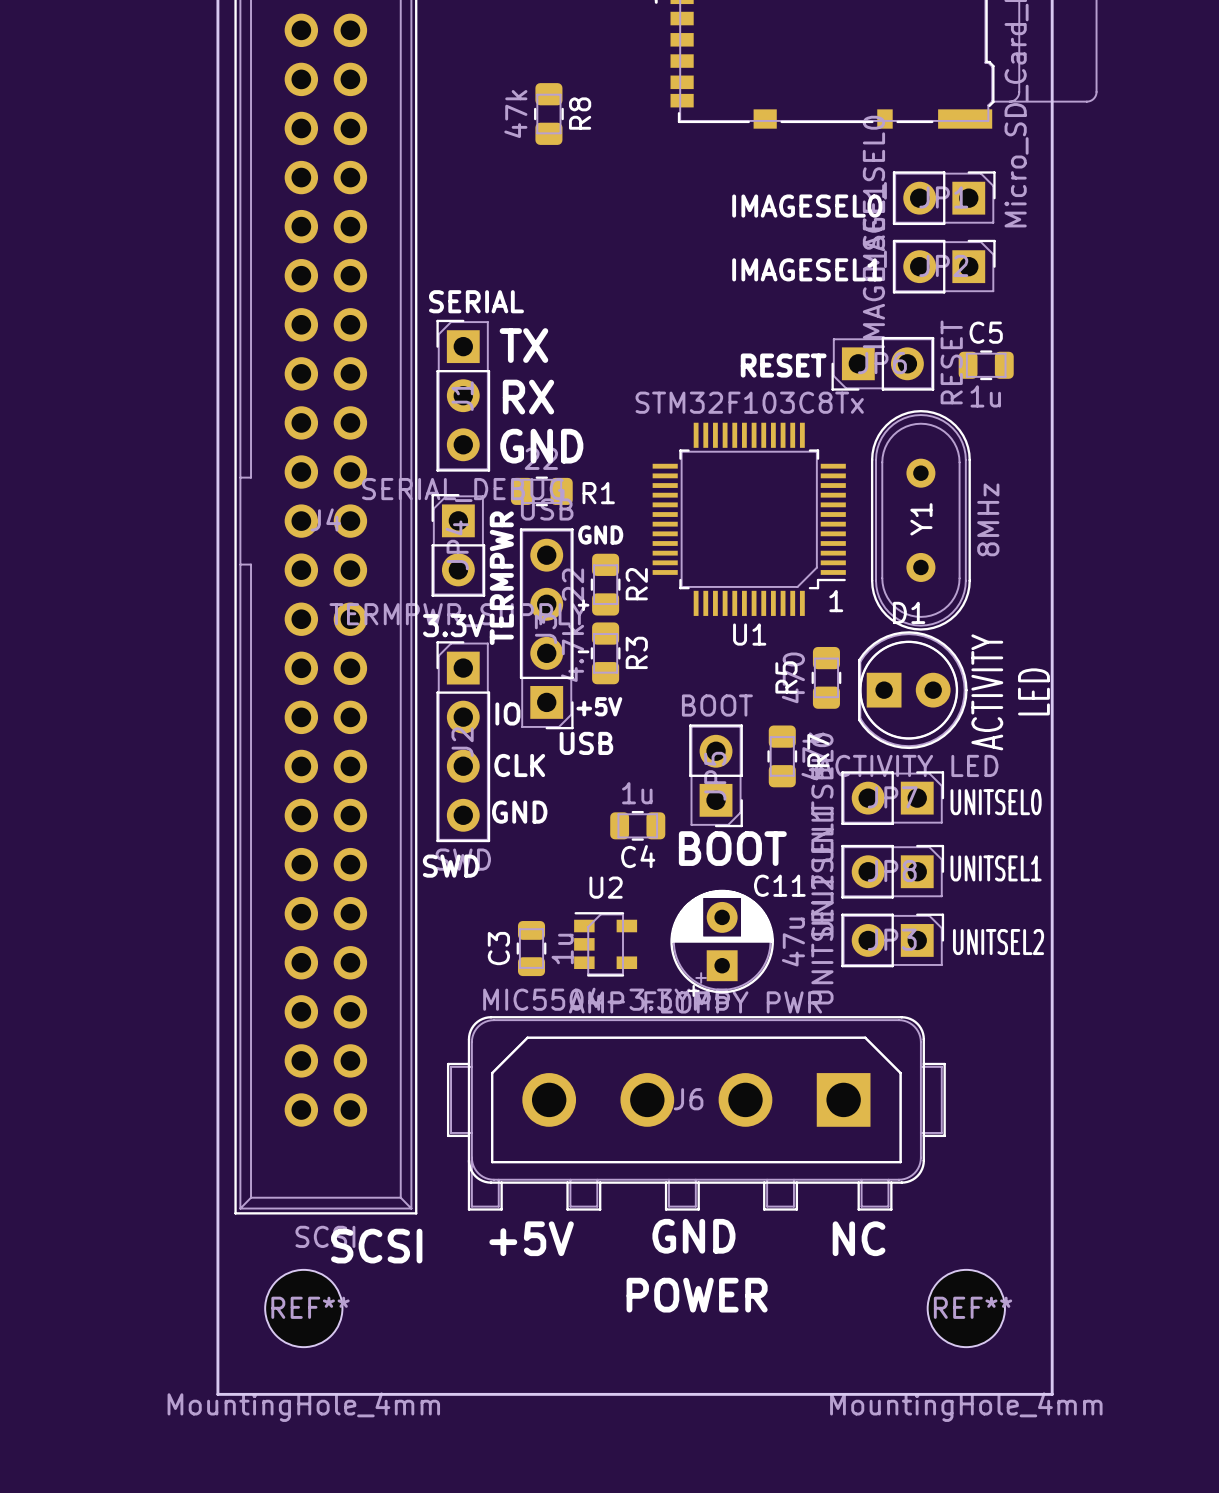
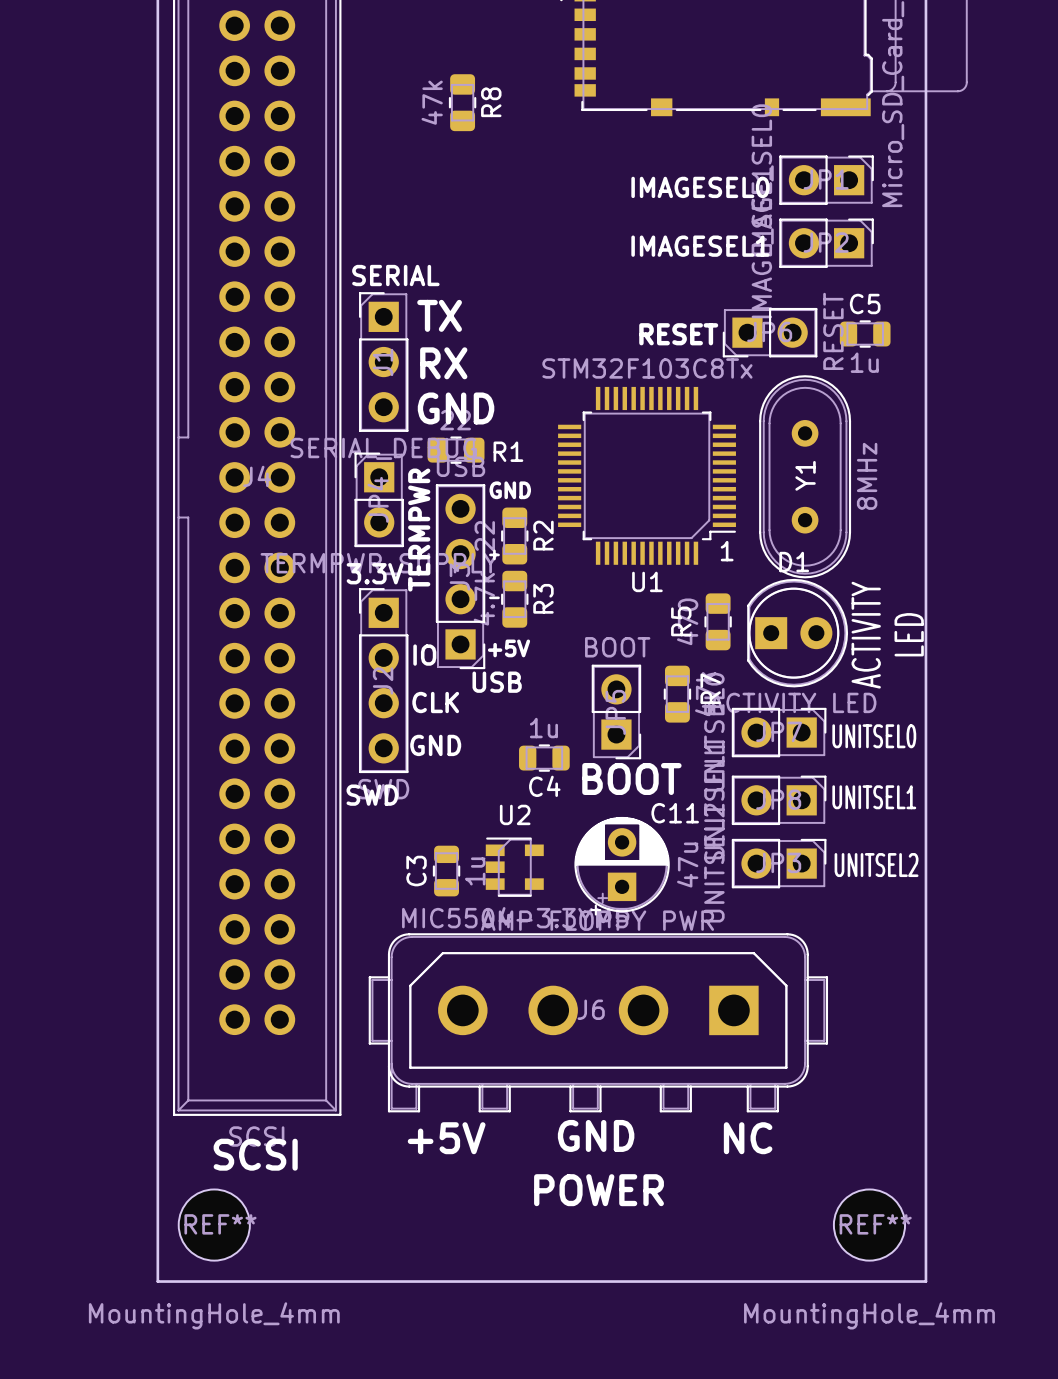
text position: SCSI (376, 1246) -> SCSI (255, 1154)
REF** position: (303, 1308) -> (214, 1225)
REF** position: (966, 1308) -> (869, 1225)

